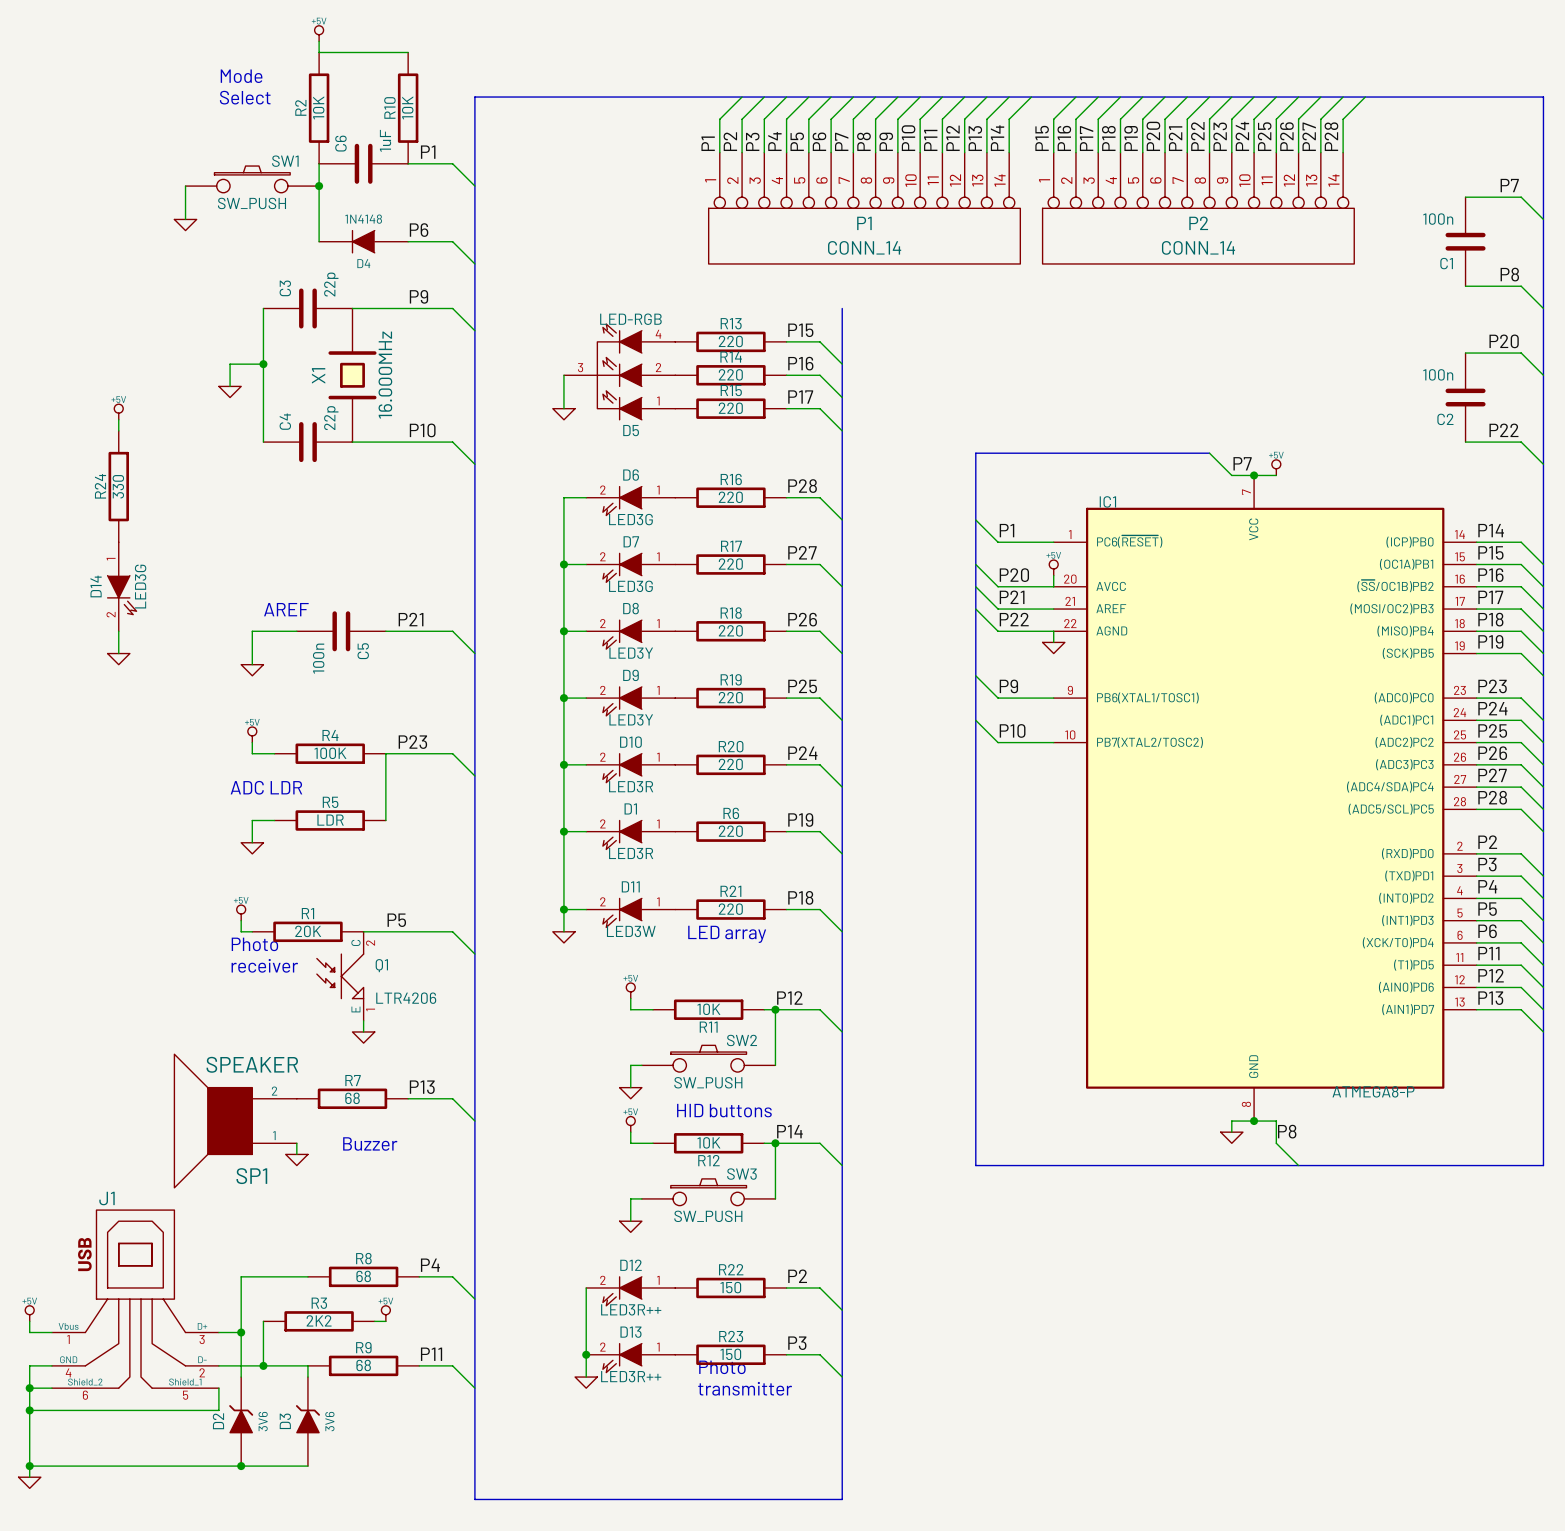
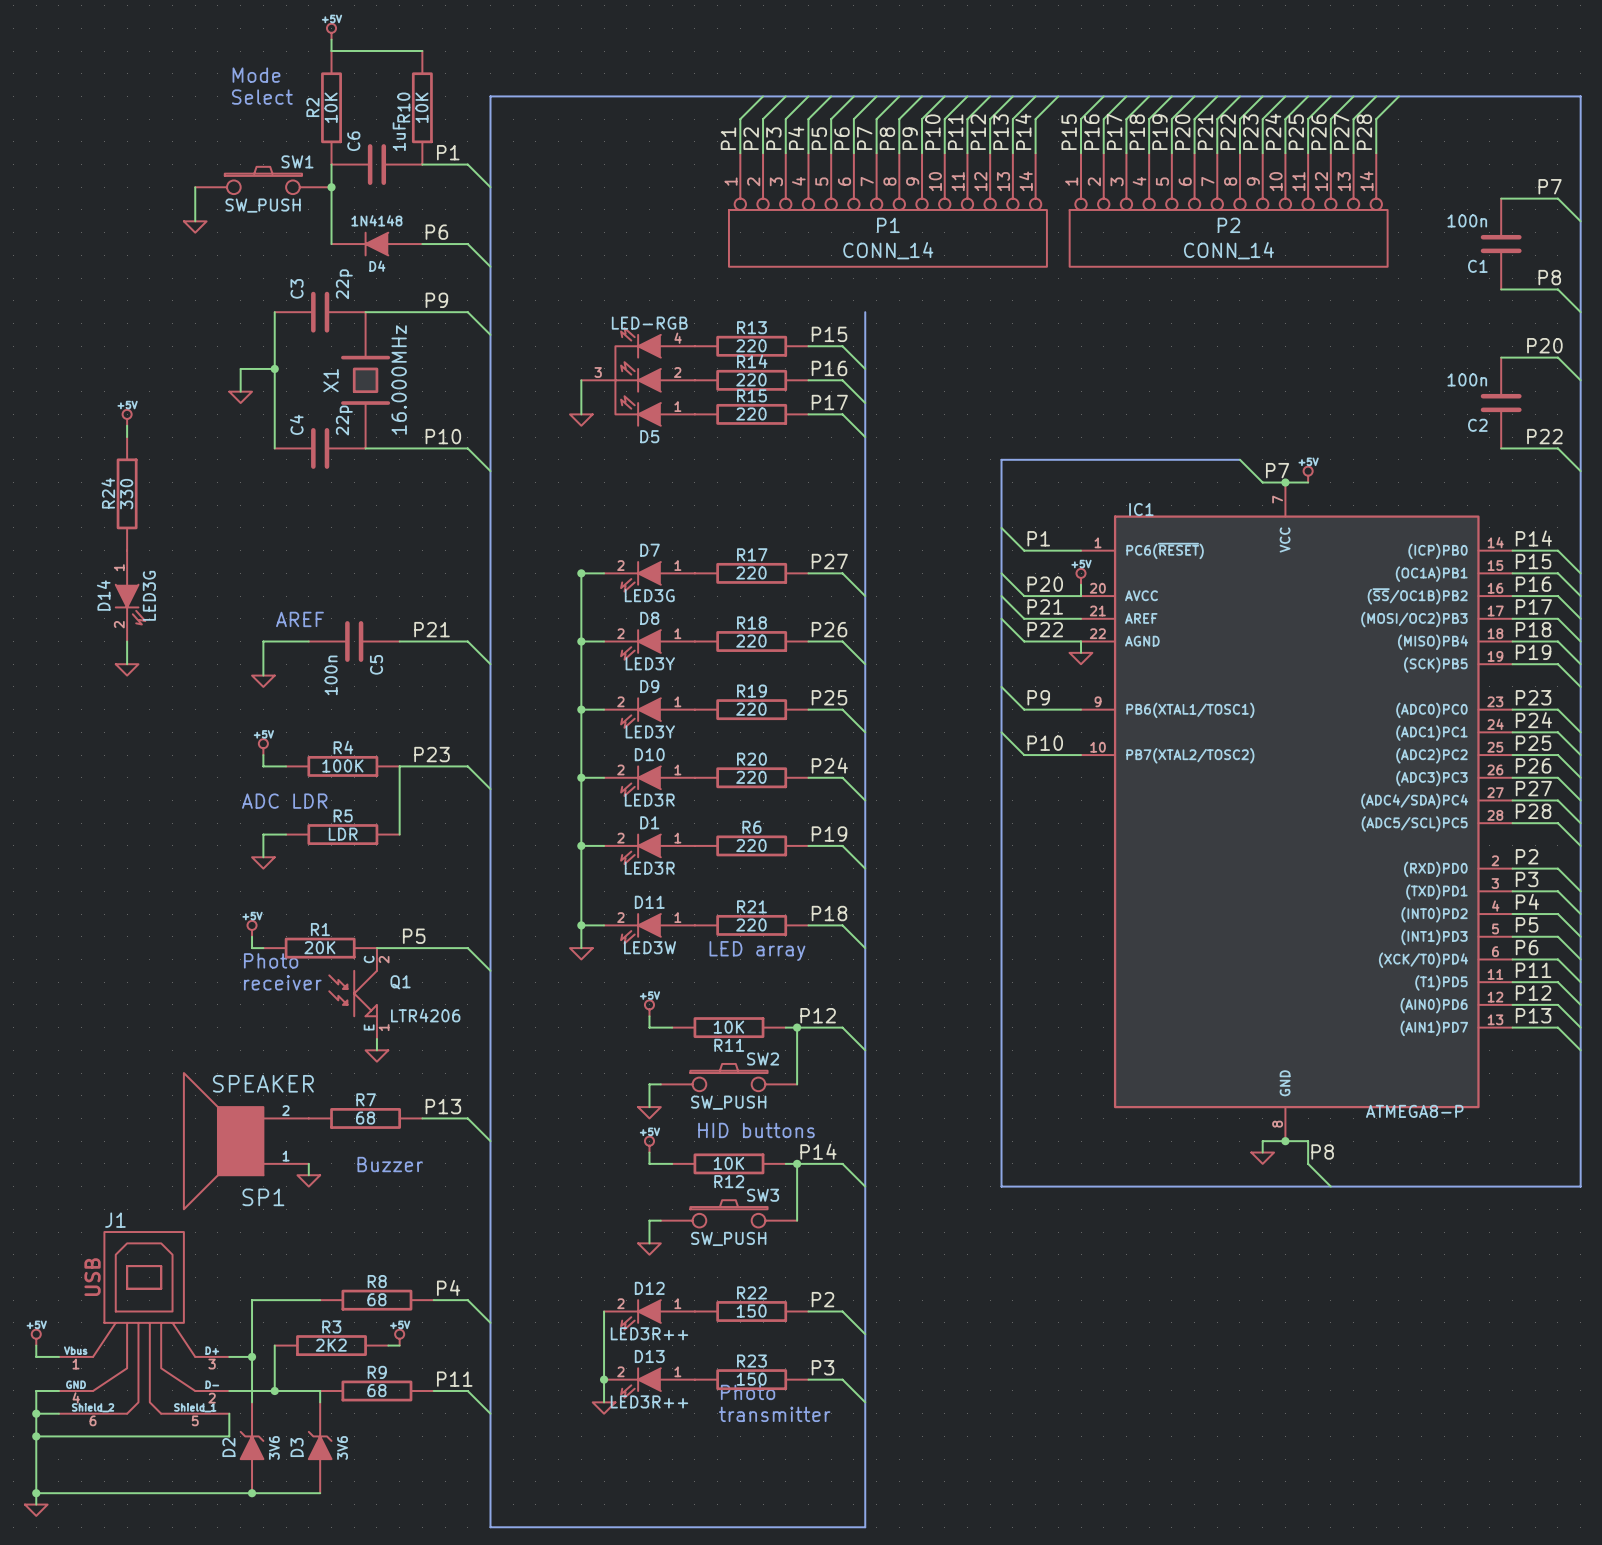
label: P28 (802, 486) -> none
wire: (586, 497) (563, 497) (563, 564) -> none
R16: 220 (730, 497) -> none
wire: (786, 497) (819, 497) (842, 519) -> none
D6: LED3G (630, 501) -> none

